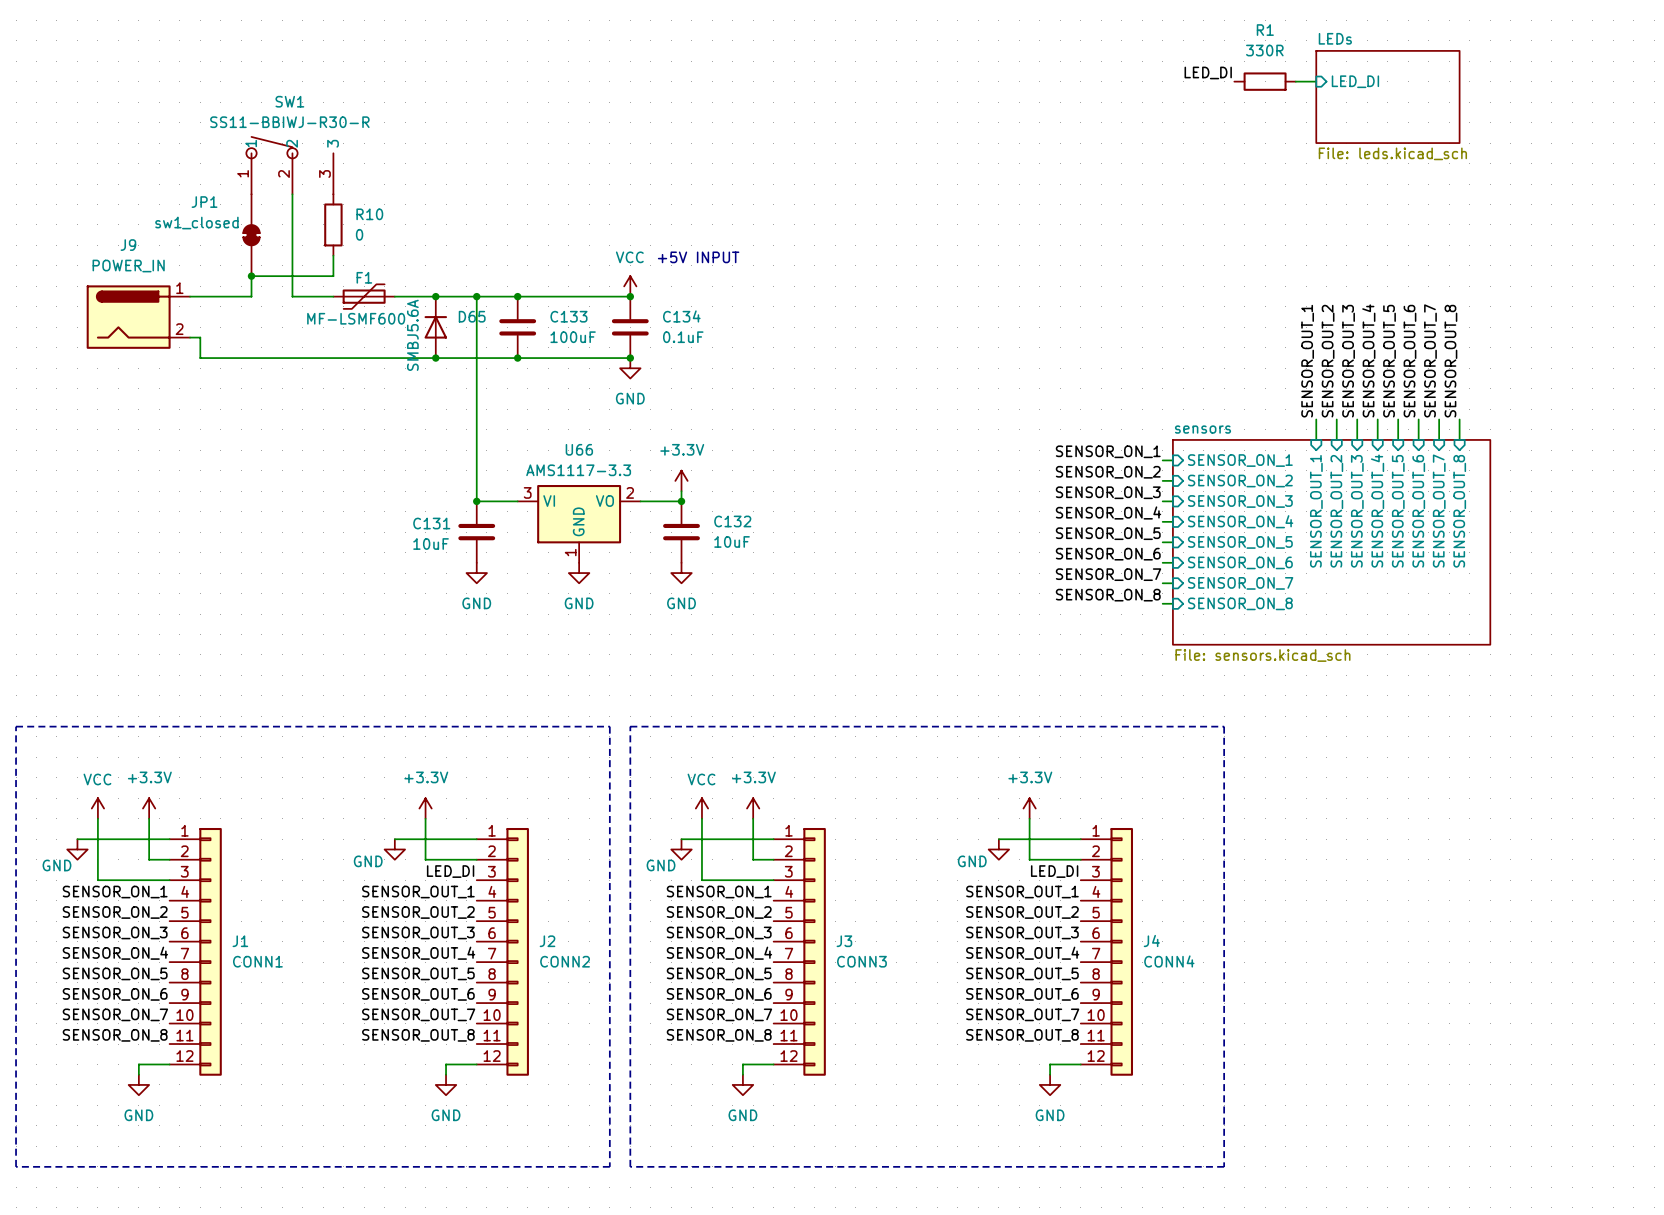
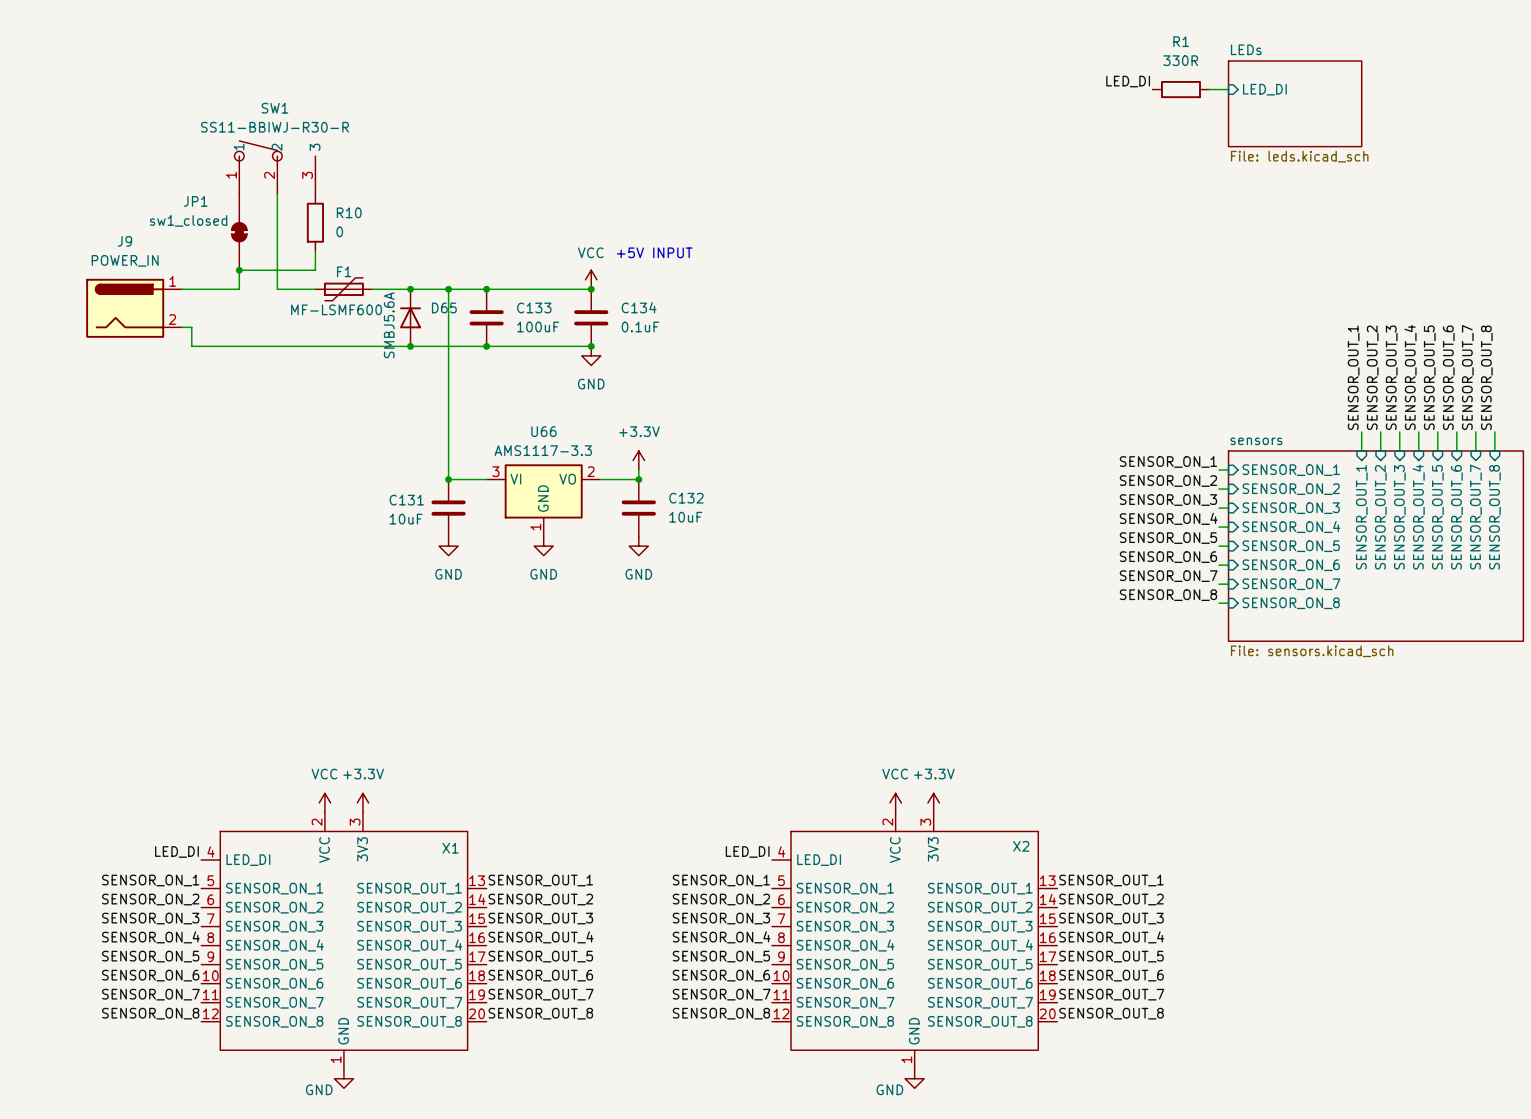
label position: SENSOR_OUT_4 (1368, 360) -> SENSOR_OUT_4 (1410, 377)
label position: SENSOR_OUT_7 (1430, 360) -> SENSOR_OUT_7 (1467, 377)
label position: SENSOR_OUT_1 (1307, 361) -> SENSOR_OUT_1 (1353, 377)
label position: SENSOR_OUT_2 (1328, 361) -> SENSOR_OUT_2 (1372, 377)
label position: SENSOR_OUT_3 (1348, 361) -> SENSOR_OUT_3 (1391, 377)
label position: SENSOR_OUT_5 (1389, 361) -> SENSOR_OUT_5 (1429, 377)
label position: SENSOR_OUT_6 (1410, 361) -> SENSOR_OUT_6 (1448, 377)
label position: SENSOR_OUT_8 (1450, 361) -> SENSOR_OUT_8 (1486, 377)
wire: (1316, 419) (1316, 439) -> (1361, 431) (1361, 451)
wire: (1336, 419) (1336, 439) -> (1380, 431) (1380, 451)
wire: (1357, 419) (1357, 439) -> (1399, 431) (1399, 451)
wire: (1377, 419) (1377, 439) -> (1418, 431) (1418, 451)
wire: (1398, 419) (1398, 439) -> (1437, 431) (1437, 451)
wire: (1418, 419) (1418, 439) -> (1456, 431) (1456, 451)
wire: (1439, 419) (1439, 439) -> (1475, 431) (1475, 451)
wire: (1459, 419) (1459, 439) -> (1494, 431) (1494, 451)
label position: SENSOR_ON_1 (1108, 451) -> SENSOR_ON_1 (1168, 461)
wire: (1162, 460) (1172, 460) -> (1219, 470) (1228, 470)
sheet pin position: SENSOR_ON_1 (1240, 460) -> SENSOR_ON_1 (1291, 470)
label position: SENSOR_ON_2 (1108, 472) -> SENSOR_ON_2 (1168, 481)
wire: (1162, 480) (1172, 480) -> (1219, 489) (1228, 489)
sheet pin position: SENSOR_ON_2 (1240, 481) -> SENSOR_ON_2 (1291, 489)
label position: SENSOR_ON_3 (1108, 492) -> SENSOR_ON_3 (1168, 500)
wire: (1162, 501) (1172, 501) -> (1219, 508) (1228, 508)
sheet pin position: SENSOR_ON_3 (1240, 501) -> SENSOR_ON_3 (1291, 508)
sheet pin position: SENSOR_OUT_1 (1316, 511) -> SENSOR_OUT_1 (1361, 517)
sheet pin position: SENSOR_OUT_2 (1336, 511) -> SENSOR_OUT_2 (1380, 517)
sheet pin position: SENSOR_OUT_3 (1357, 511) -> SENSOR_OUT_3 (1399, 517)
sheet pin position: SENSOR_OUT_4 (1377, 511) -> SENSOR_OUT_4 (1418, 517)
sheet pin position: SENSOR_OUT_5 (1398, 511) -> SENSOR_OUT_5 (1437, 517)
sheet pin position: SENSOR_OUT_6 (1418, 511) -> SENSOR_OUT_6 (1456, 517)
sheet pin position: SENSOR_OUT_7 (1439, 511) -> SENSOR_OUT_7 (1475, 517)
sheet pin position: SENSOR_OUT_8 (1459, 511) -> SENSOR_OUT_8 (1494, 517)
label position: SENSOR_ON_4 (1108, 512) -> SENSOR_ON_4 (1168, 518)
wire: (1162, 521) (1172, 521) -> (1219, 527) (1228, 527)
sheet pin position: SENSOR_ON_4 (1240, 521) -> SENSOR_ON_4 (1291, 526)
label position: SENSOR_ON_5 (1108, 533) -> SENSOR_ON_5 (1168, 538)
wire: (1162, 542) (1172, 542) -> (1219, 546) (1228, 546)
sheet pin position: SENSOR_ON_5 (1240, 542) -> SENSOR_ON_5 (1291, 546)
sheet sensors position: (1331, 542) -> (1375, 546)
label position: SENSOR_ON_6 (1108, 554) -> SENSOR_ON_6 (1168, 557)
wire: (1162, 562) (1172, 562) -> (1219, 565) (1228, 565)
sheet pin position: SENSOR_ON_6 (1240, 562) -> SENSOR_ON_6 (1291, 565)
label position: SENSOR_ON_7 (1108, 574) -> SENSOR_ON_7 (1168, 576)
wire: (1162, 583) (1172, 583) -> (1219, 584) (1228, 584)
sheet pin position: SENSOR_ON_7 (1240, 583) -> SENSOR_ON_7 (1291, 584)
label position: SENSOR_ON_8 (1108, 595) -> SENSOR_ON_8 (1168, 595)
wire: (1162, 603) (1172, 603) -> (1219, 603) (1228, 603)
sheet pin position: SENSOR_ON_8 (1240, 603) -> SENSOR_ON_8 (1291, 603)
line: (16, 726) (609, 726) (609, 1166) (16, 1166) (16, 726) -> none
line: (630, 726) (1224, 726) (1224, 1166) (630, 1166) (630, 726) -> none
power symbol: VCC (97, 808) -> none
power symbol: +3.3V (149, 808) -> none
power symbol position: +3.3V (425, 808) -> +3.3V (362, 802)
power symbol: VCC (701, 808) -> none
power symbol: +3.3V (753, 808) -> none
power symbol: +3.3V (1029, 808) -> none
wire: (97, 818) (97, 880) (169, 880) -> none
wire: (149, 818) (149, 859) (169, 859) -> none
wire: (425, 818) (425, 859) (476, 859) -> none
wire: (701, 818) (701, 880) (773, 880) -> none
wire: (753, 818) (753, 859) (773, 859) -> none
wire: (1029, 818) (1029, 859) (1080, 859) -> none
wire: (77, 839) (169, 839) -> none
wire: (394, 839) (476, 839) -> none
wire: (681, 839) (773, 839) -> none
wire: (998, 839) (1080, 839) -> none
power symbol: GND (77, 849) -> none
power symbol: none -> VCC (324, 802)
power symbol: GND (394, 849) -> none
power symbol: GND (681, 849) -> none
power symbol: none -> VCC (895, 802)
power symbol: GND (998, 849) -> +3.3V (933, 802)
label: LED_DI (450, 871) -> none
label: LED_DI (1054, 871) -> none
label position: SENSOR_ON_1 (115, 892) -> SENSOR_ON_1 (150, 880)
label position: SENSOR_OUT_1 (418, 892) -> SENSOR_OUT_1 (540, 880)
label position: SENSOR_ON_1 (719, 892) -> SENSOR_ON_1 (721, 880)
label position: SENSOR_OUT_1 (1022, 892) -> SENSOR_OUT_1 (1111, 880)
label: none -> LED_DI (176, 851)
label: none -> LED_DI (747, 851)
label position: SENSOR_ON_2 (115, 912) -> SENSOR_ON_2 (150, 899)
label position: SENSOR_OUT_2 (418, 912) -> SENSOR_OUT_2 (540, 899)
label position: SENSOR_ON_2 (719, 912) -> SENSOR_ON_2 (721, 899)
label position: SENSOR_OUT_2 (1022, 912) -> SENSOR_OUT_2 (1111, 899)
label position: SENSOR_ON_3 (115, 932) -> SENSOR_ON_3 (150, 918)
label position: SENSOR_OUT_3 (418, 932) -> SENSOR_OUT_3 (540, 918)
label position: SENSOR_ON_3 (719, 932) -> SENSOR_ON_3 (721, 918)
label position: SENSOR_OUT_3 (1022, 932) -> SENSOR_OUT_3 (1111, 918)
J1: CONN1 (195, 951) -> none
J2: CONN2 (502, 951) -> none
J3: CONN3 (799, 951) -> none
J4: CONN4 (1106, 951) -> none
label position: SENSOR_ON_4 (115, 953) -> SENSOR_ON_4 (150, 937)
label position: SENSOR_OUT_4 (418, 953) -> SENSOR_OUT_4 (541, 937)
label position: SENSOR_ON_4 (719, 953) -> SENSOR_ON_4 (721, 937)
label position: SENSOR_OUT_4 (1022, 953) -> SENSOR_OUT_4 (1111, 937)
label position: SENSOR_ON_5 (115, 973) -> SENSOR_ON_5 (150, 956)
label position: SENSOR_OUT_5 (418, 973) -> SENSOR_OUT_5 (540, 956)
label position: SENSOR_ON_5 (719, 973) -> SENSOR_ON_5 (721, 956)
label position: SENSOR_OUT_5 (1022, 973) -> SENSOR_OUT_5 (1111, 956)
label position: SENSOR_ON_6 (115, 994) -> SENSOR_ON_6 (150, 975)
label position: SENSOR_OUT_6 (418, 994) -> SENSOR_OUT_6 (540, 975)
label position: SENSOR_ON_6 (719, 994) -> SENSOR_ON_6 (721, 975)
label position: SENSOR_OUT_6 (1022, 994) -> SENSOR_OUT_6 (1111, 975)
X1: none -> (343, 940)
X2: none -> (914, 940)
label position: SENSOR_ON_7 (115, 1014) -> SENSOR_ON_7 (150, 994)
label position: SENSOR_OUT_7 (418, 1014) -> SENSOR_OUT_7 (541, 994)
label position: SENSOR_ON_7 (719, 1014) -> SENSOR_ON_7 (721, 994)
label position: SENSOR_OUT_7 (1022, 1014) -> SENSOR_OUT_7 (1111, 994)
label position: SENSOR_ON_8 (115, 1035) -> SENSOR_ON_8 (150, 1013)
label position: SENSOR_OUT_8 (418, 1035) -> SENSOR_OUT_8 (540, 1013)
label position: SENSOR_ON_8 (719, 1035) -> SENSOR_ON_8 (721, 1013)
label position: SENSOR_OUT_8 (1022, 1035) -> SENSOR_OUT_8 (1111, 1013)
wire: (169, 1064) (138, 1064) (138, 1074) -> none
wire: (476, 1064) (446, 1064) (446, 1074) -> none
wire: (773, 1064) (742, 1064) (742, 1074) -> none
wire: (1080, 1064) (1050, 1064) (1050, 1074) -> none
power symbol: GND (138, 1084) -> none
power symbol position: GND (446, 1084) -> GND (343, 1078)
power symbol: GND (742, 1084) -> none
power symbol position: GND (1050, 1084) -> GND (914, 1078)
power symbol text position: GND (446, 1115) -> GND (319, 1089)
power symbol text position: GND (1050, 1115) -> GND (889, 1089)

